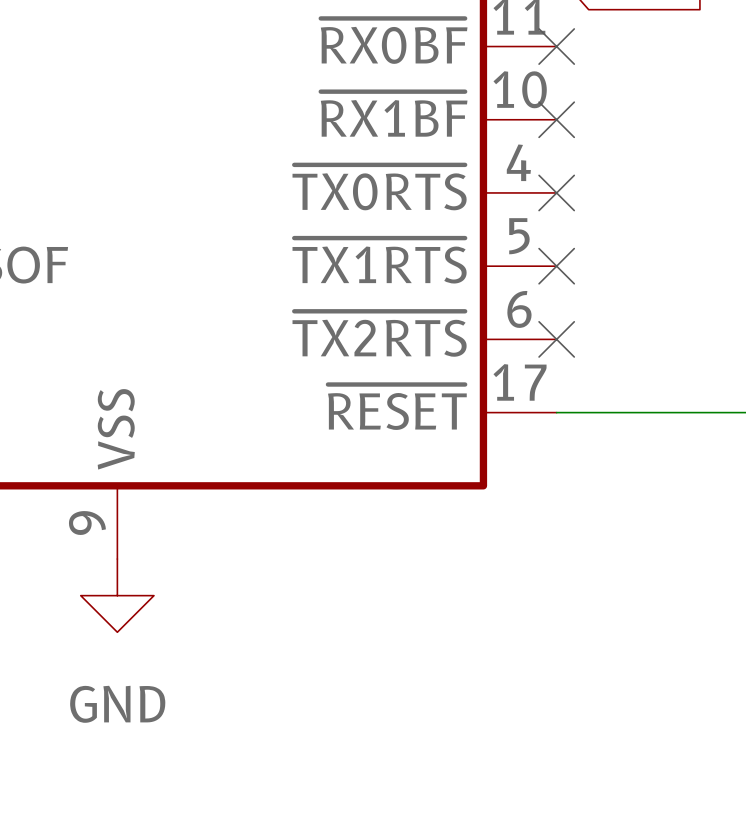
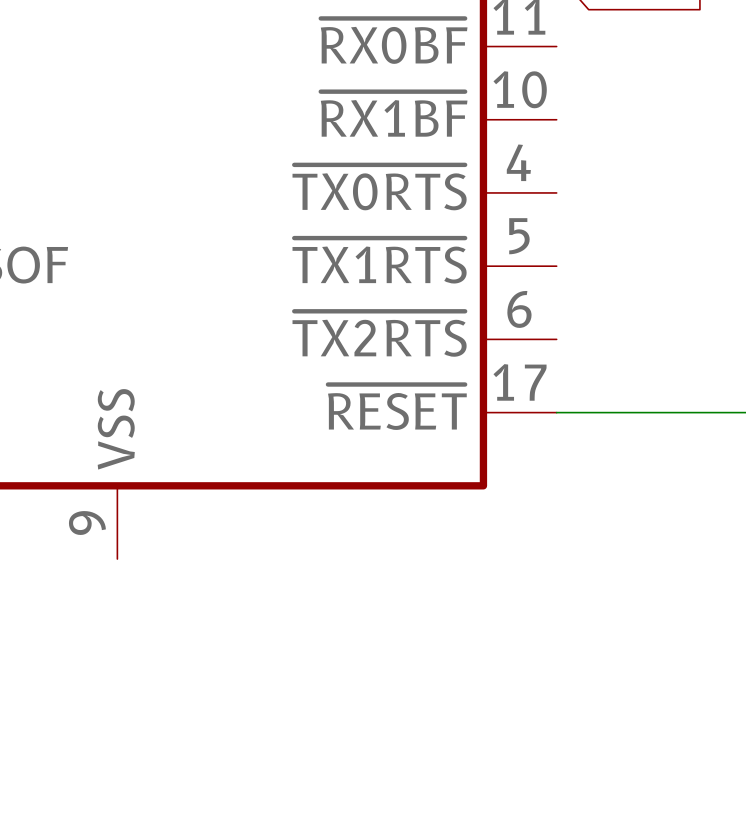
no-connect mark: (556, 46) -> none
no-connect mark: (556, 119) -> none
no-connect mark: (556, 192) -> none
no-connect mark: (556, 266) -> none
no-connect mark: (556, 339) -> none
power symbol: GND (117, 595) -> none

